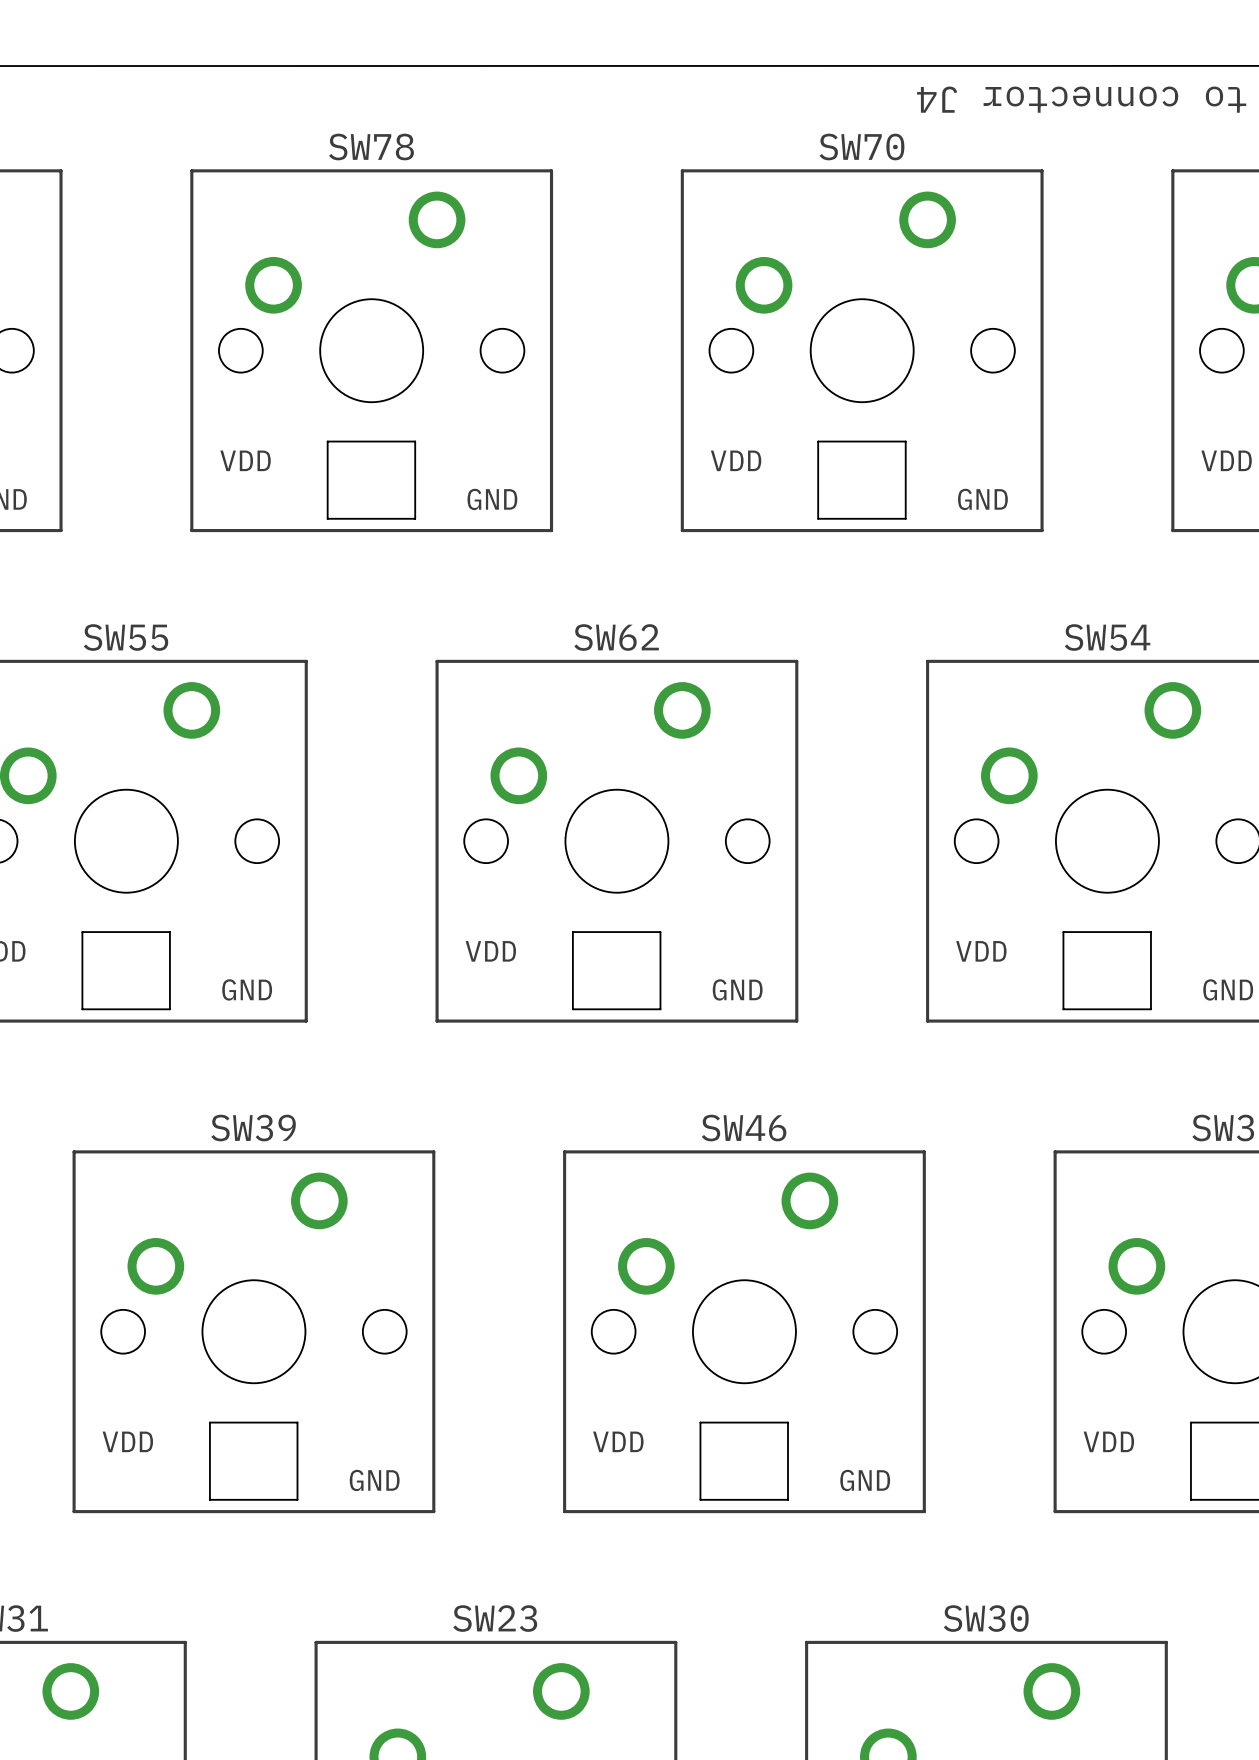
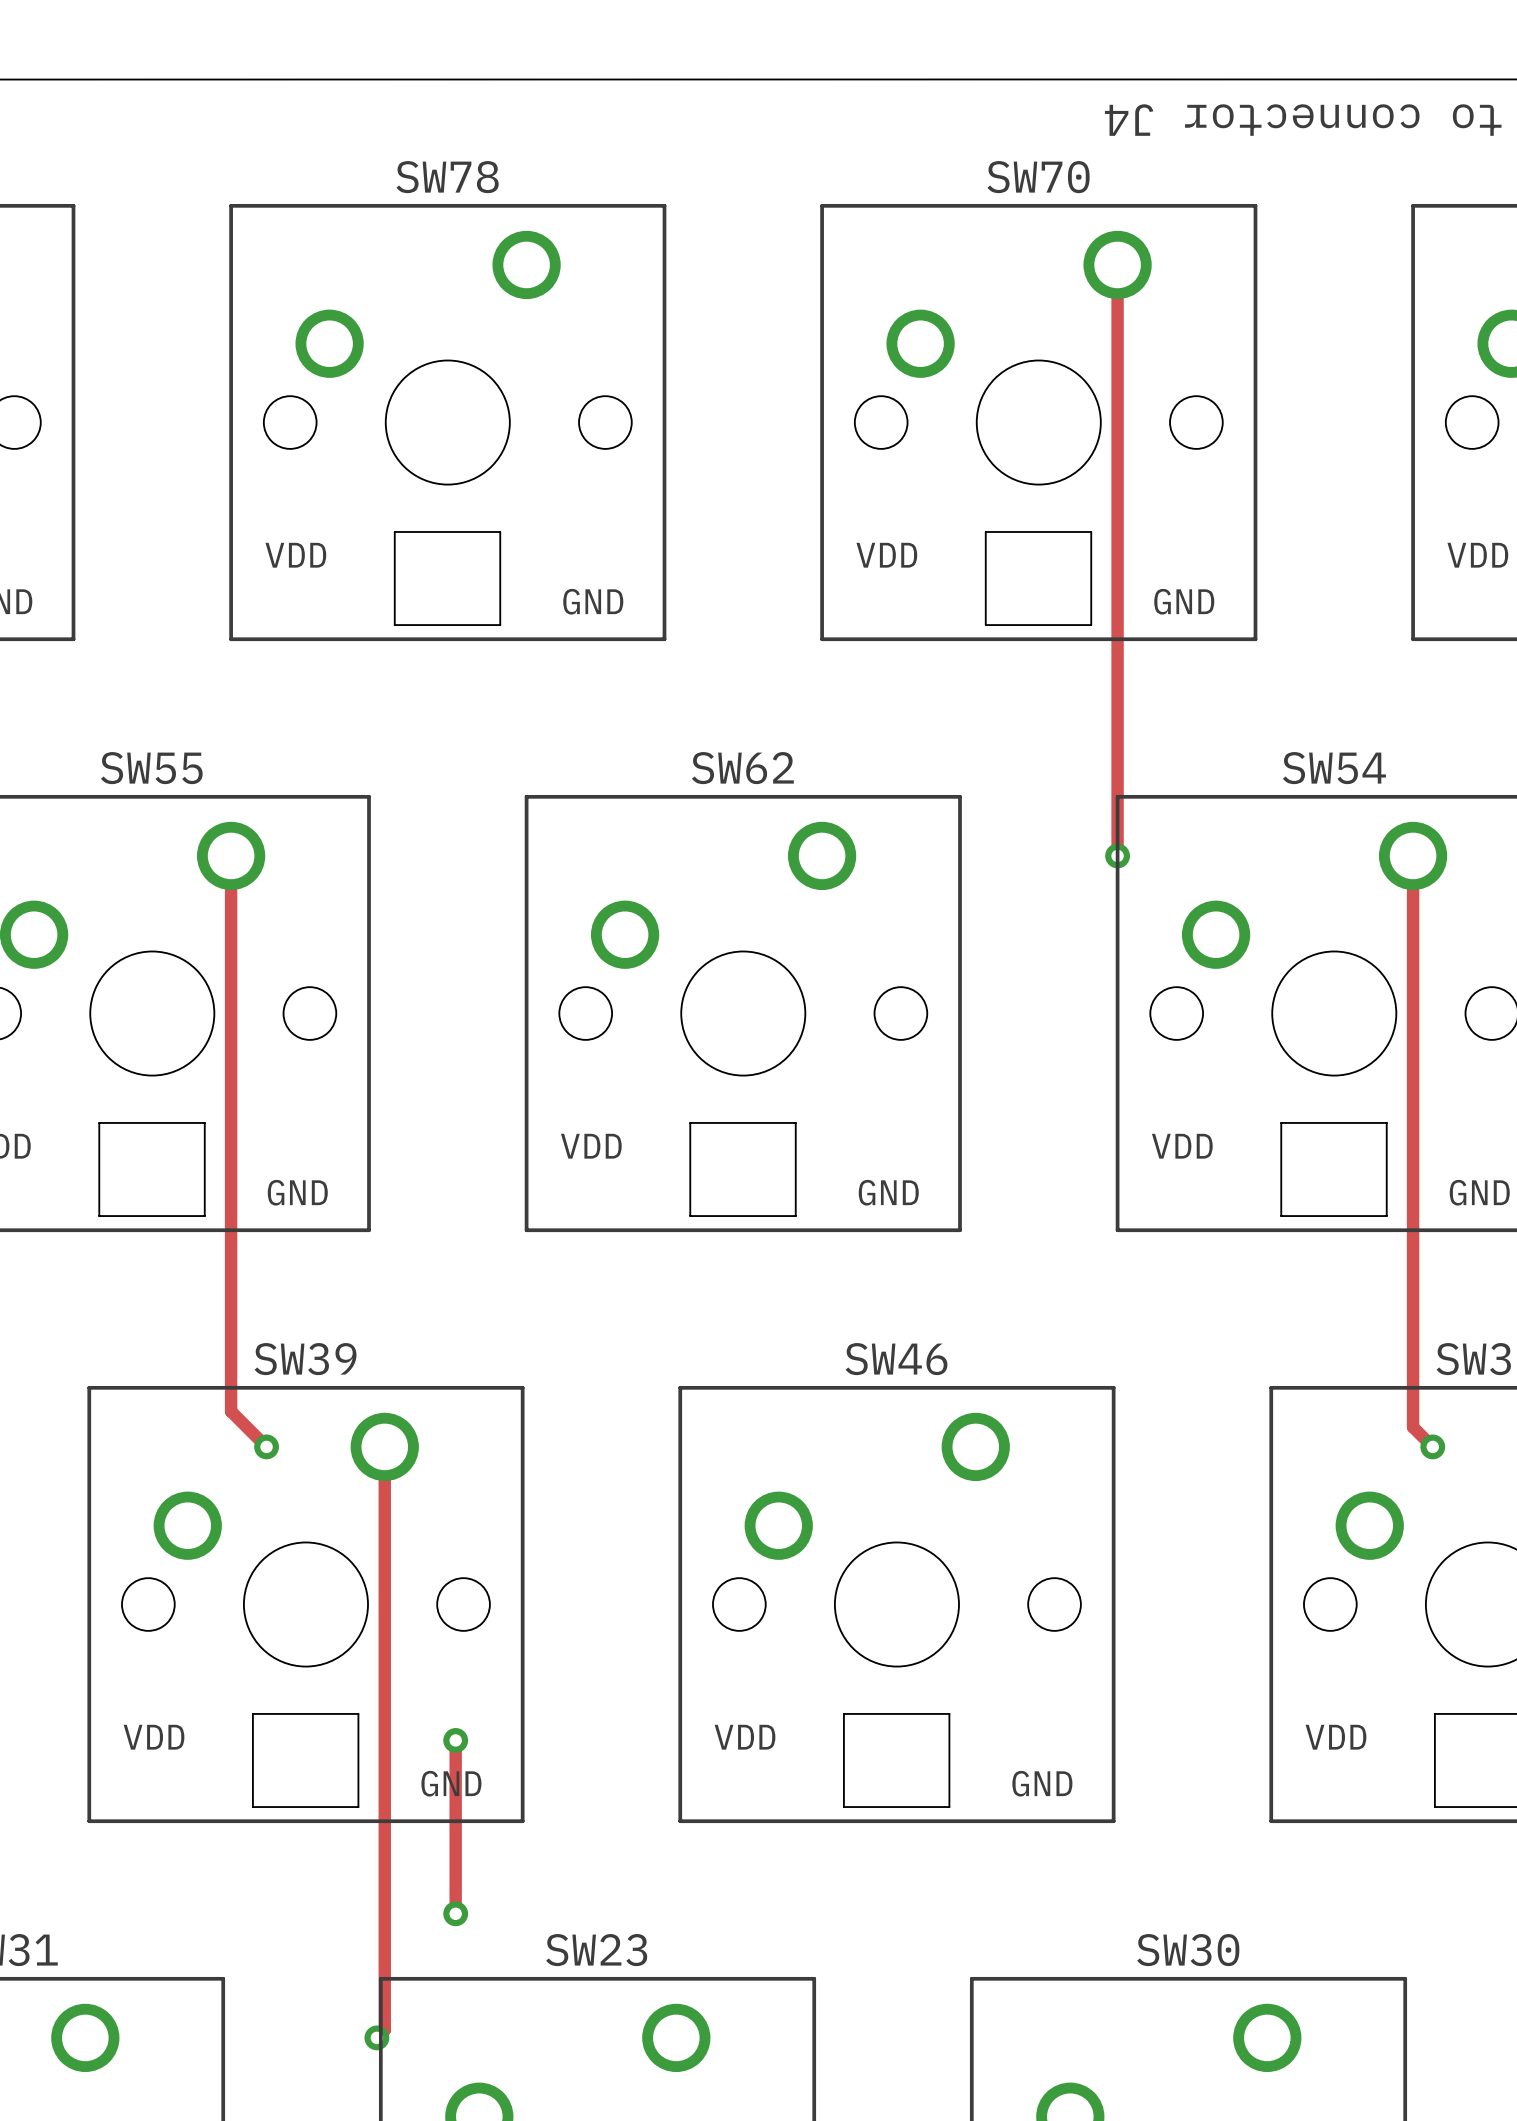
track: none -> (1117, 264) (1117, 855)
track: none -> (231, 855) (231, 1411) (266, 1446)
via: none -> (1117, 855)
track: none -> (1413, 855) (1413, 1427) (1432, 1446)
via: none -> (266, 1446)
track: none -> (384, 1446) (384, 2030) (376, 2037)
via: none -> (1432, 1446)
track: none -> (455, 1740) (455, 1913)
via: none -> (455, 1740)
via: none -> (455, 1913)
via: none -> (376, 2037)

